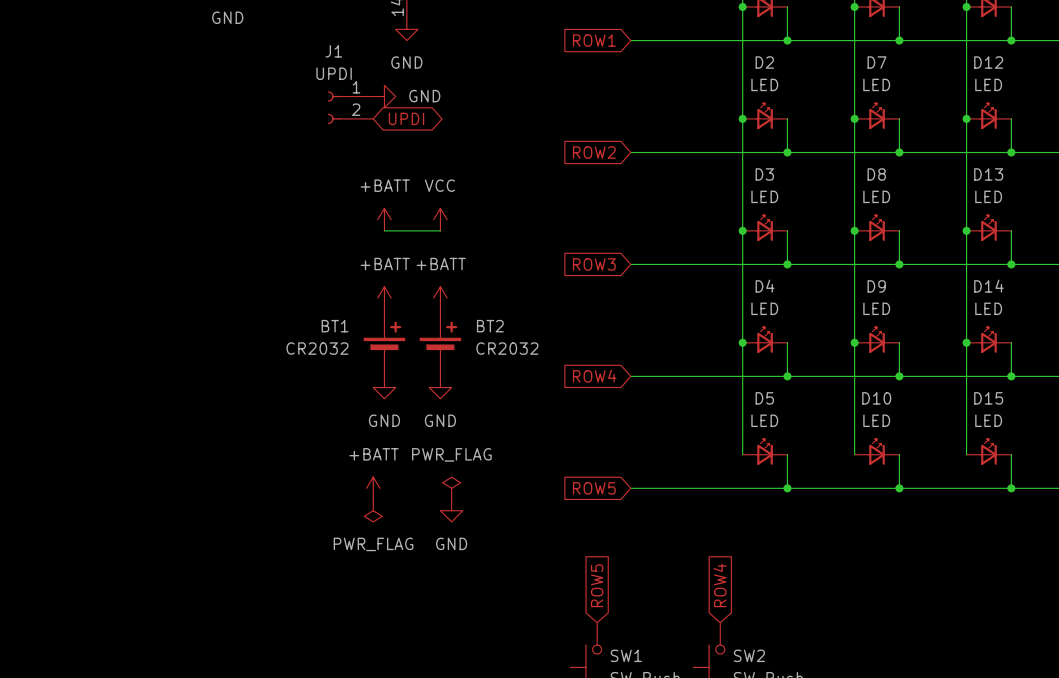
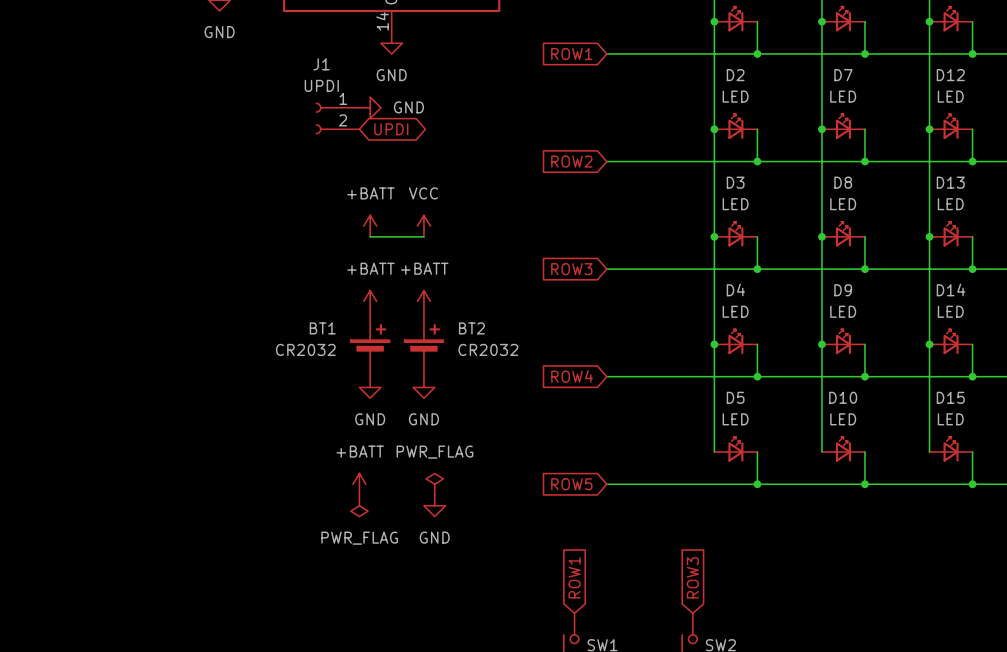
global label: ROW5 (597, 585) -> ROW1 (574, 577)
global label: ROW4 (720, 585) -> ROW3 (692, 577)

